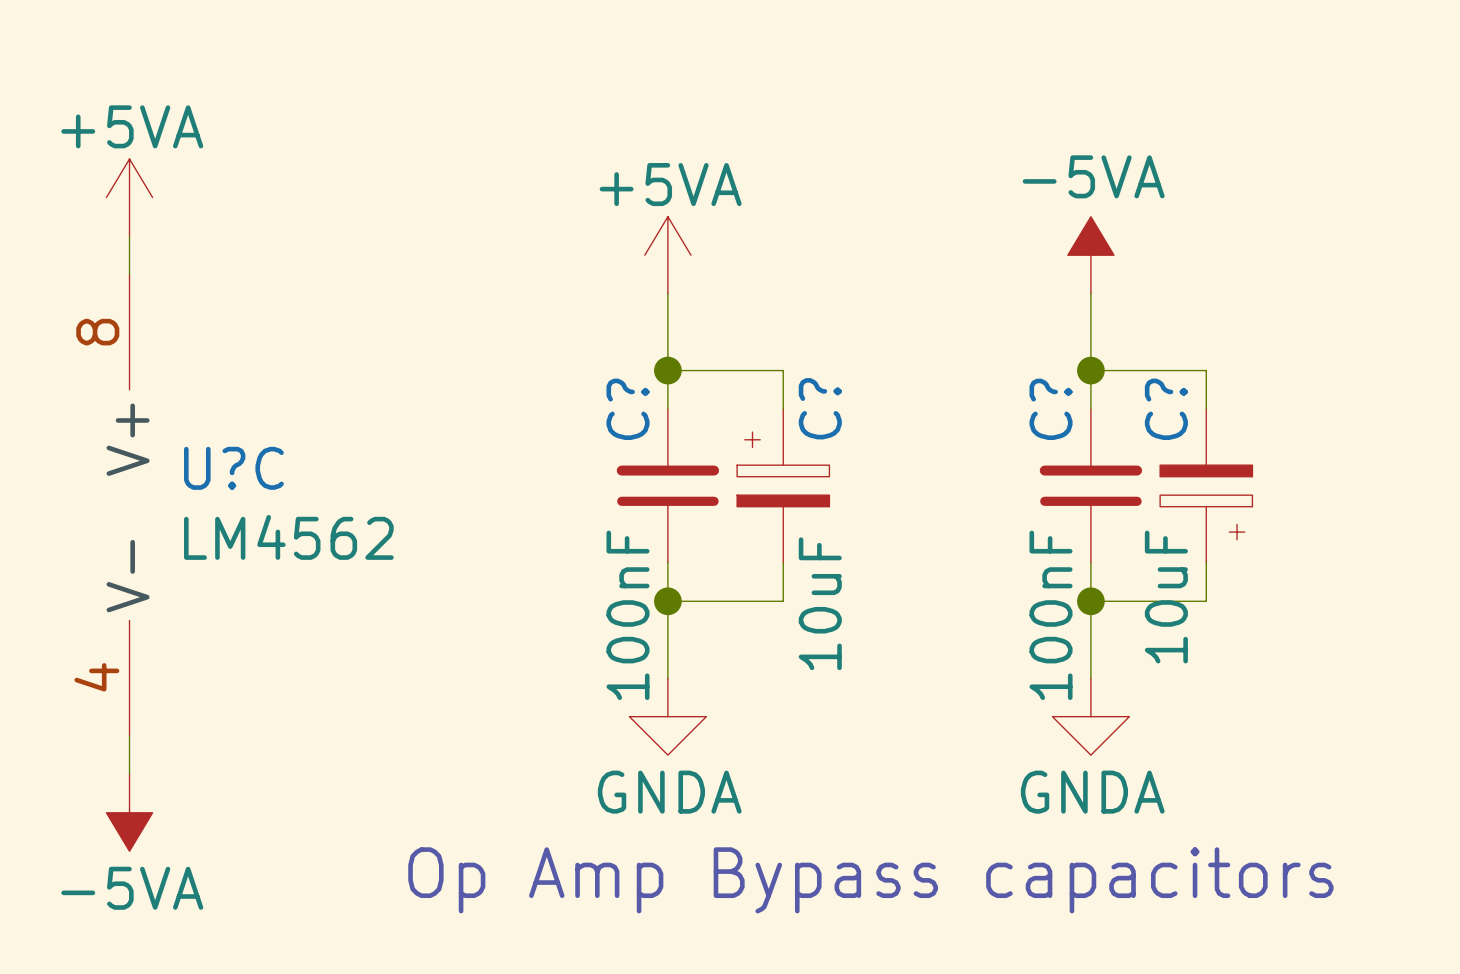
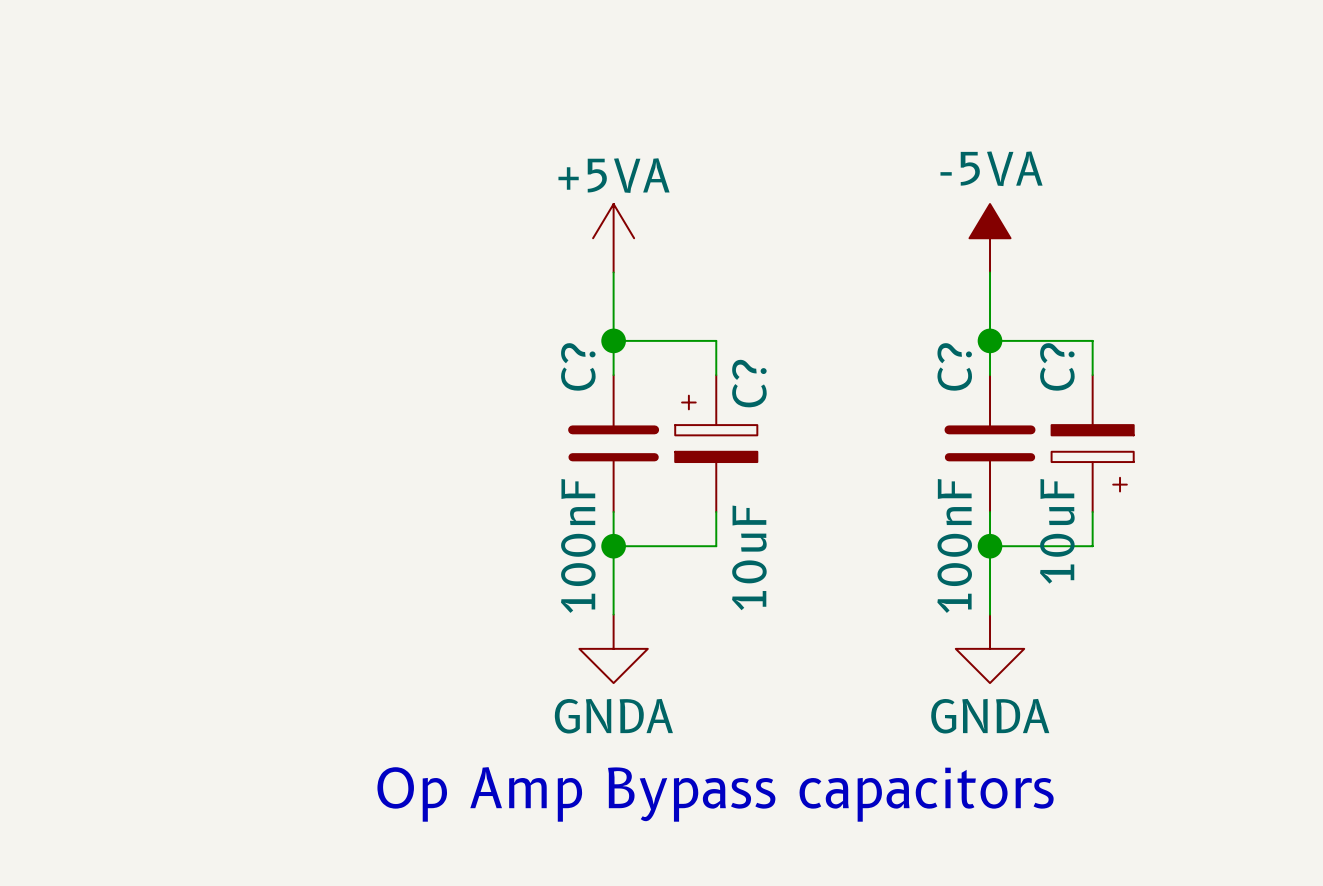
power symbol: +5VA (129, 197) -> none
wire: (129, 235) (129, 274) -> none
U?C: LM4562 (129, 505) -> none
wire: (129, 735) (129, 774) -> none
power symbol: -5VA (129, 812) -> none

